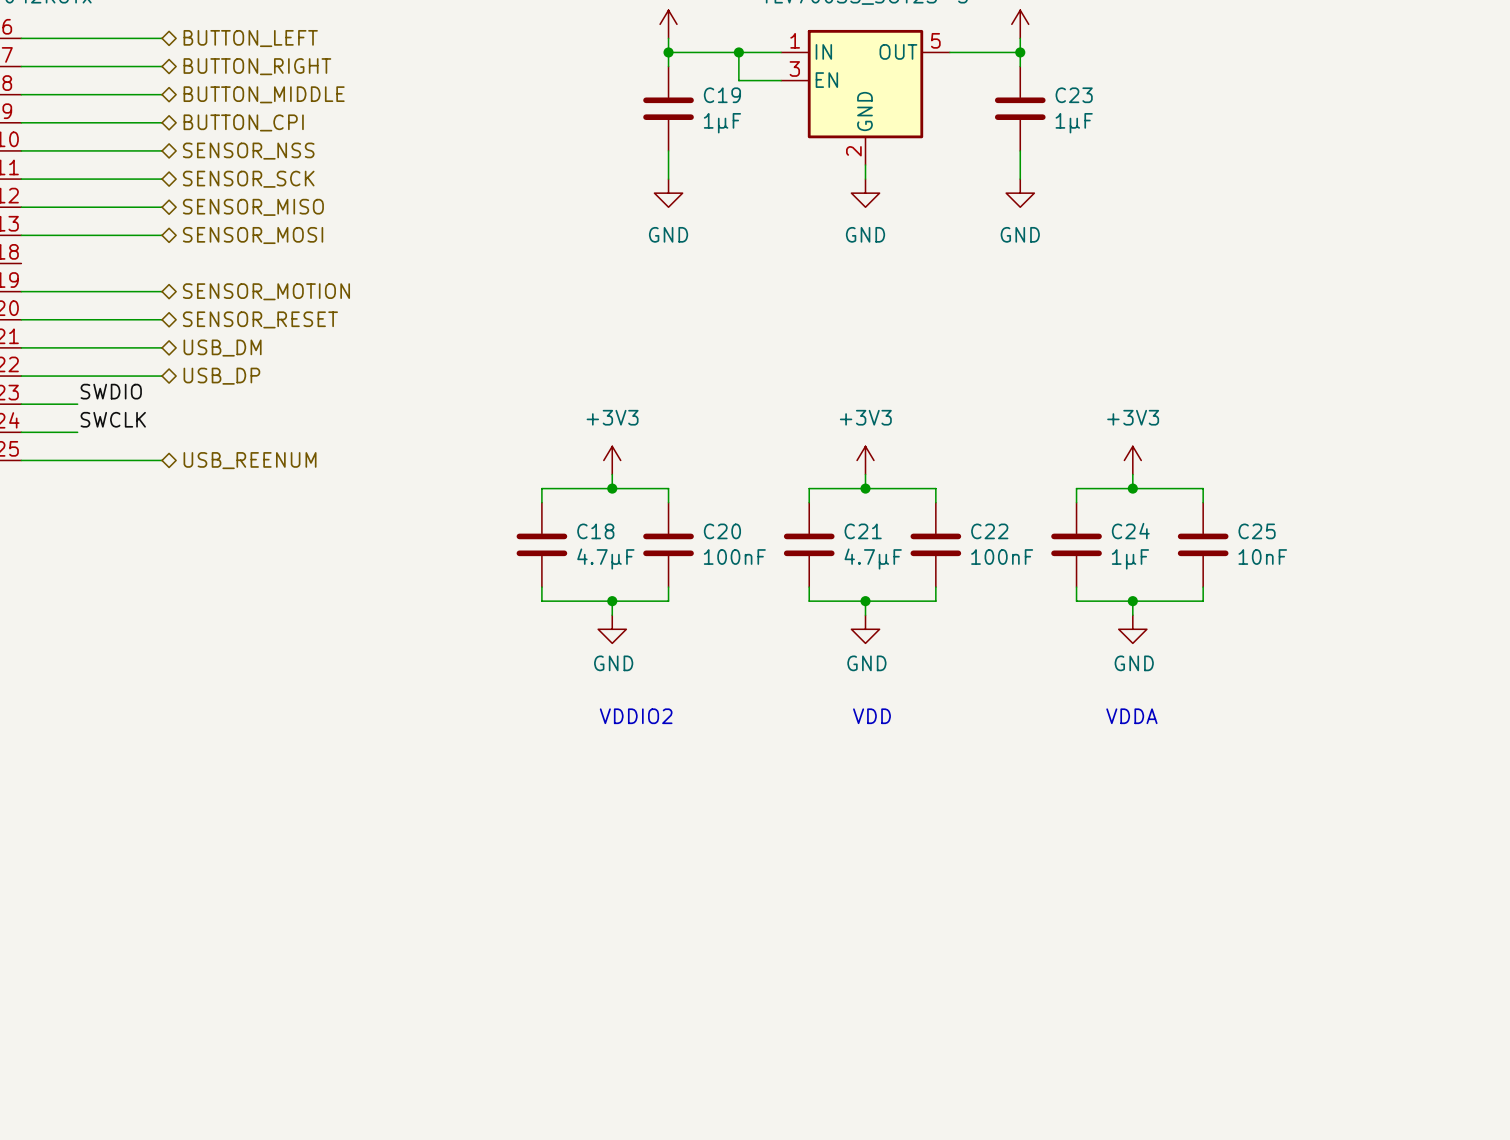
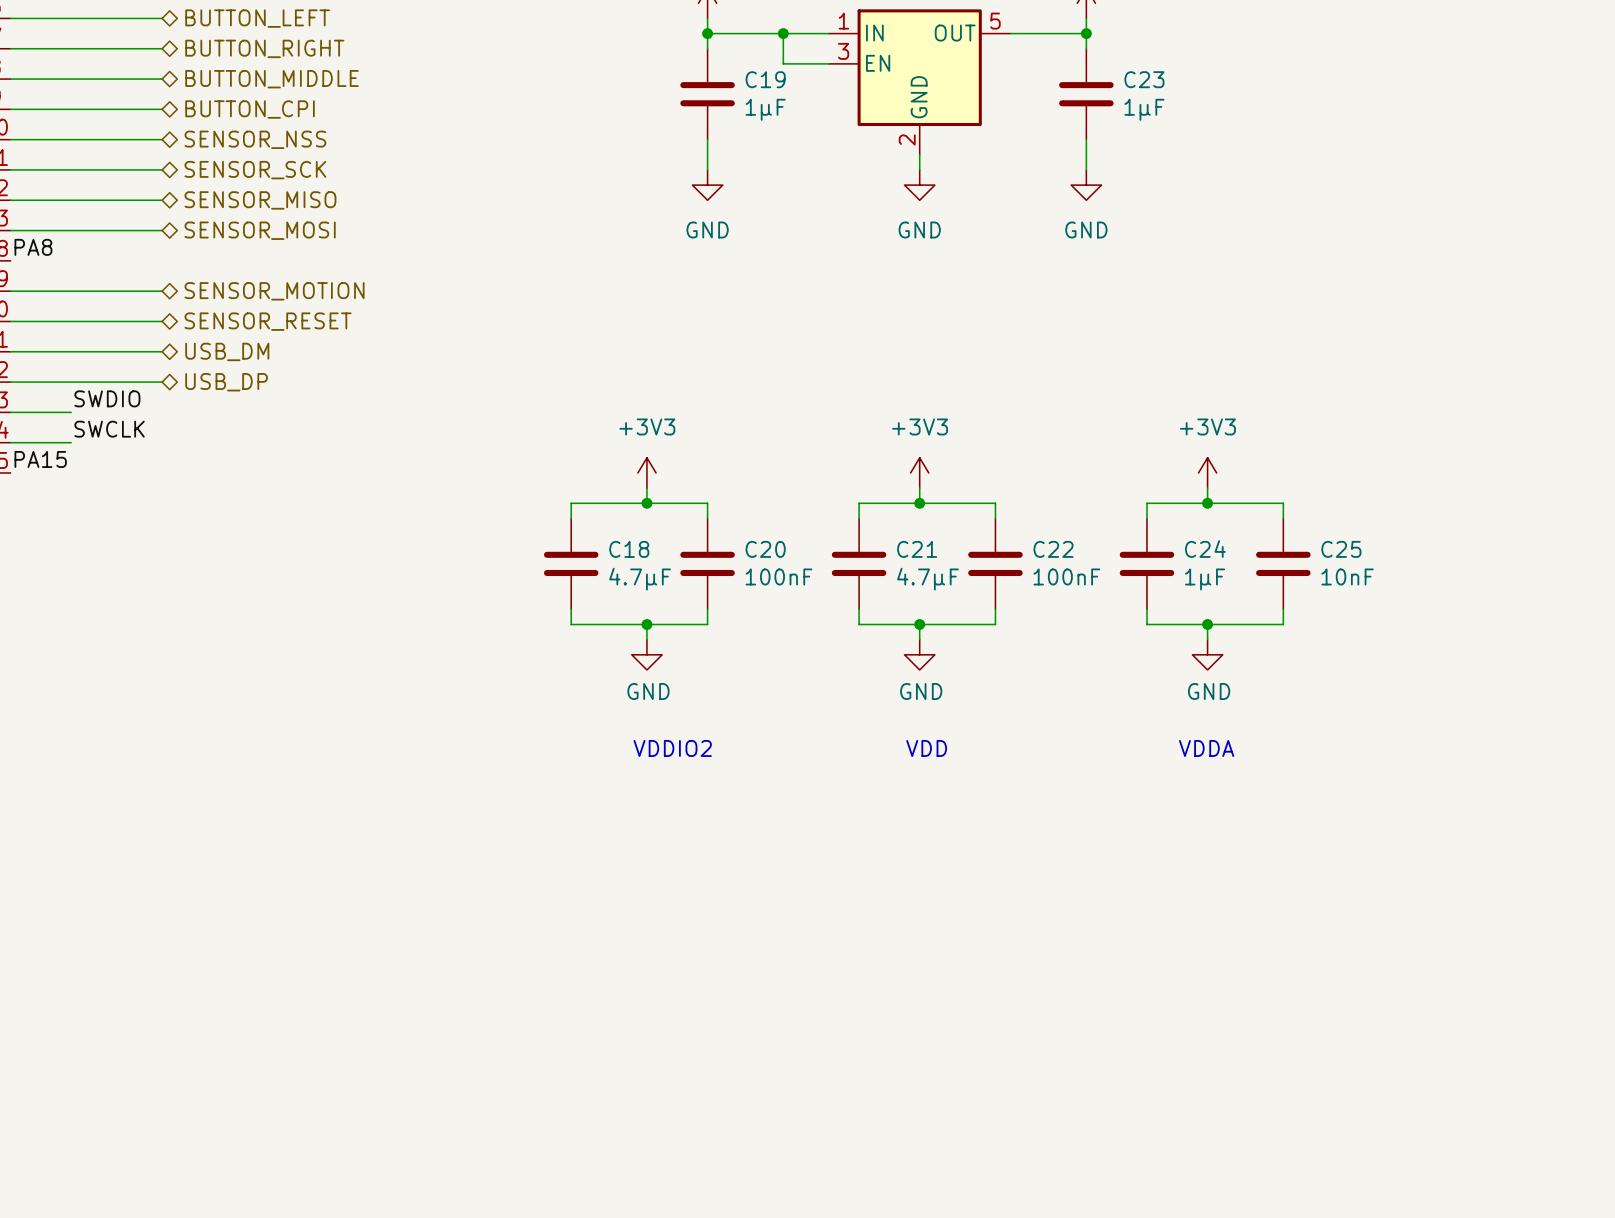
label: none -> PA8 (33, 247)
label: none -> PA15 (40, 459)
wire: (21, 460) (162, 460) -> none
hierarchical label: USB_REENUM (250, 460) -> none

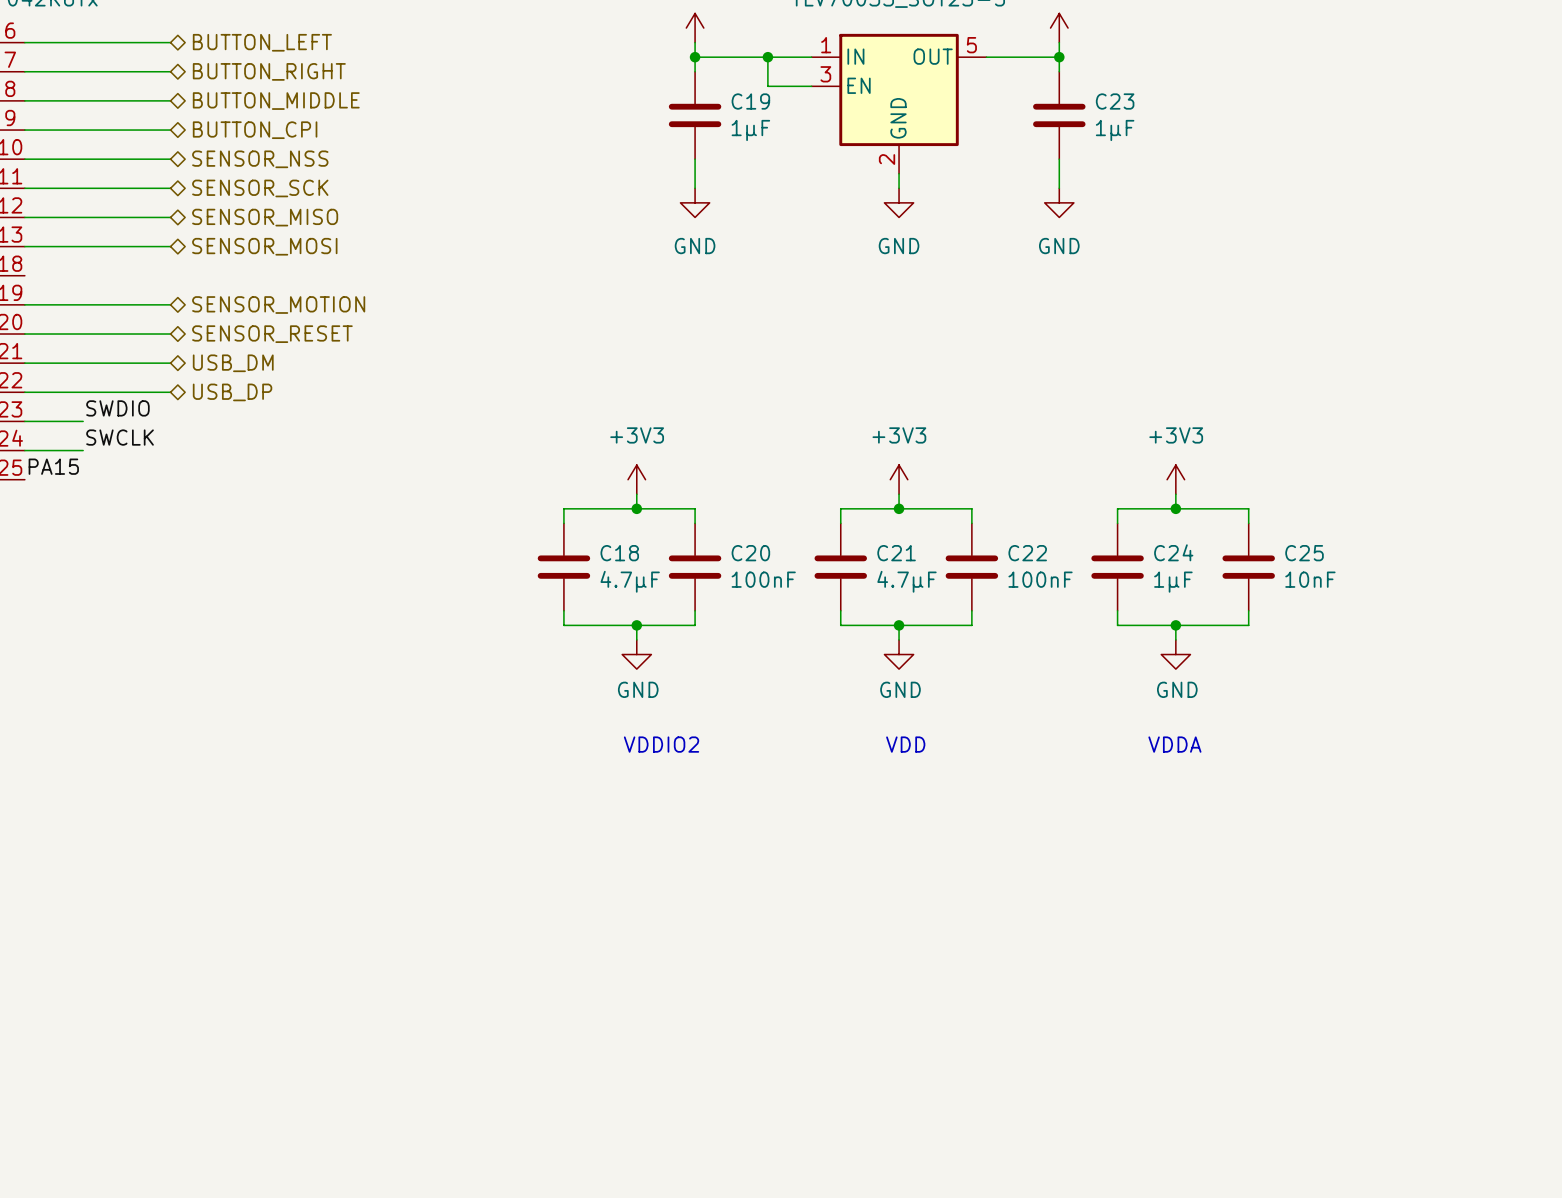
label: PA8 (33, 247) -> none

